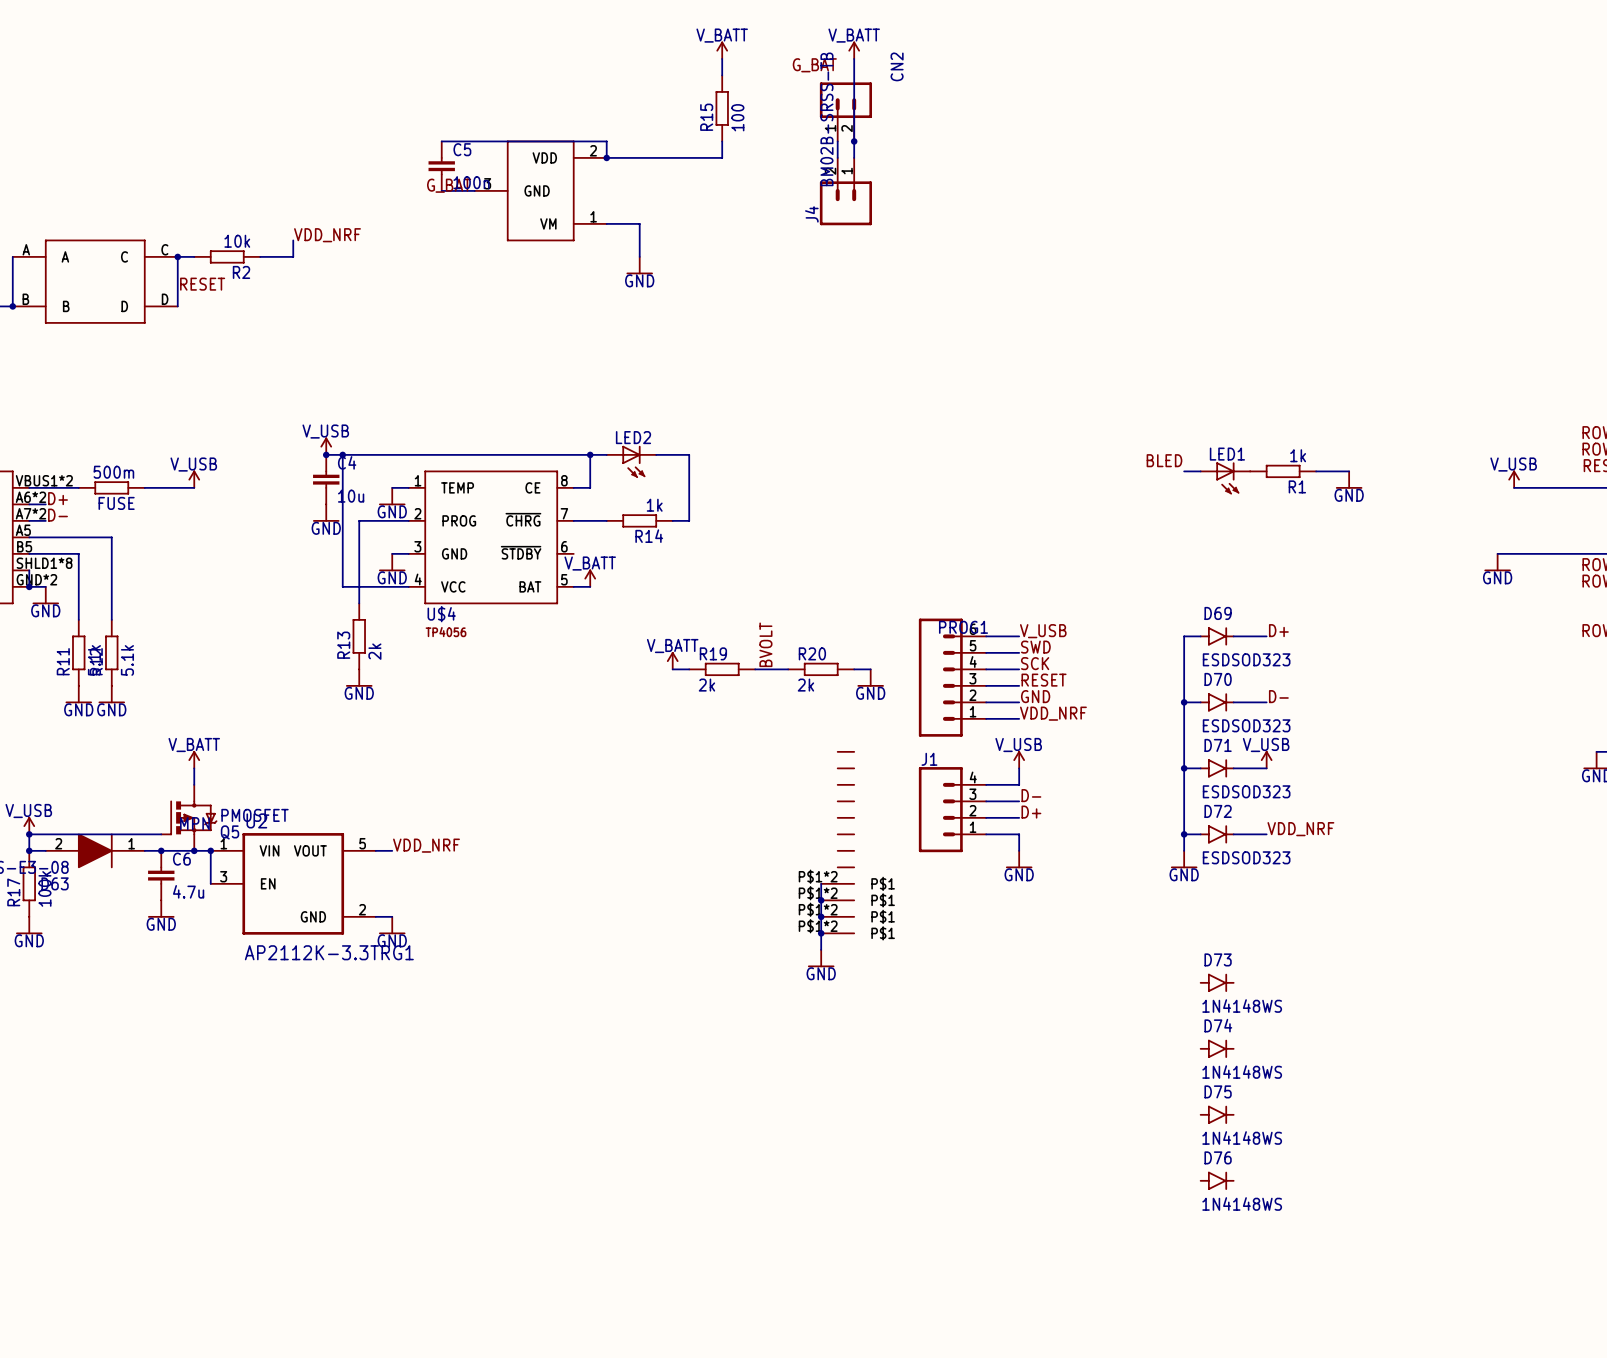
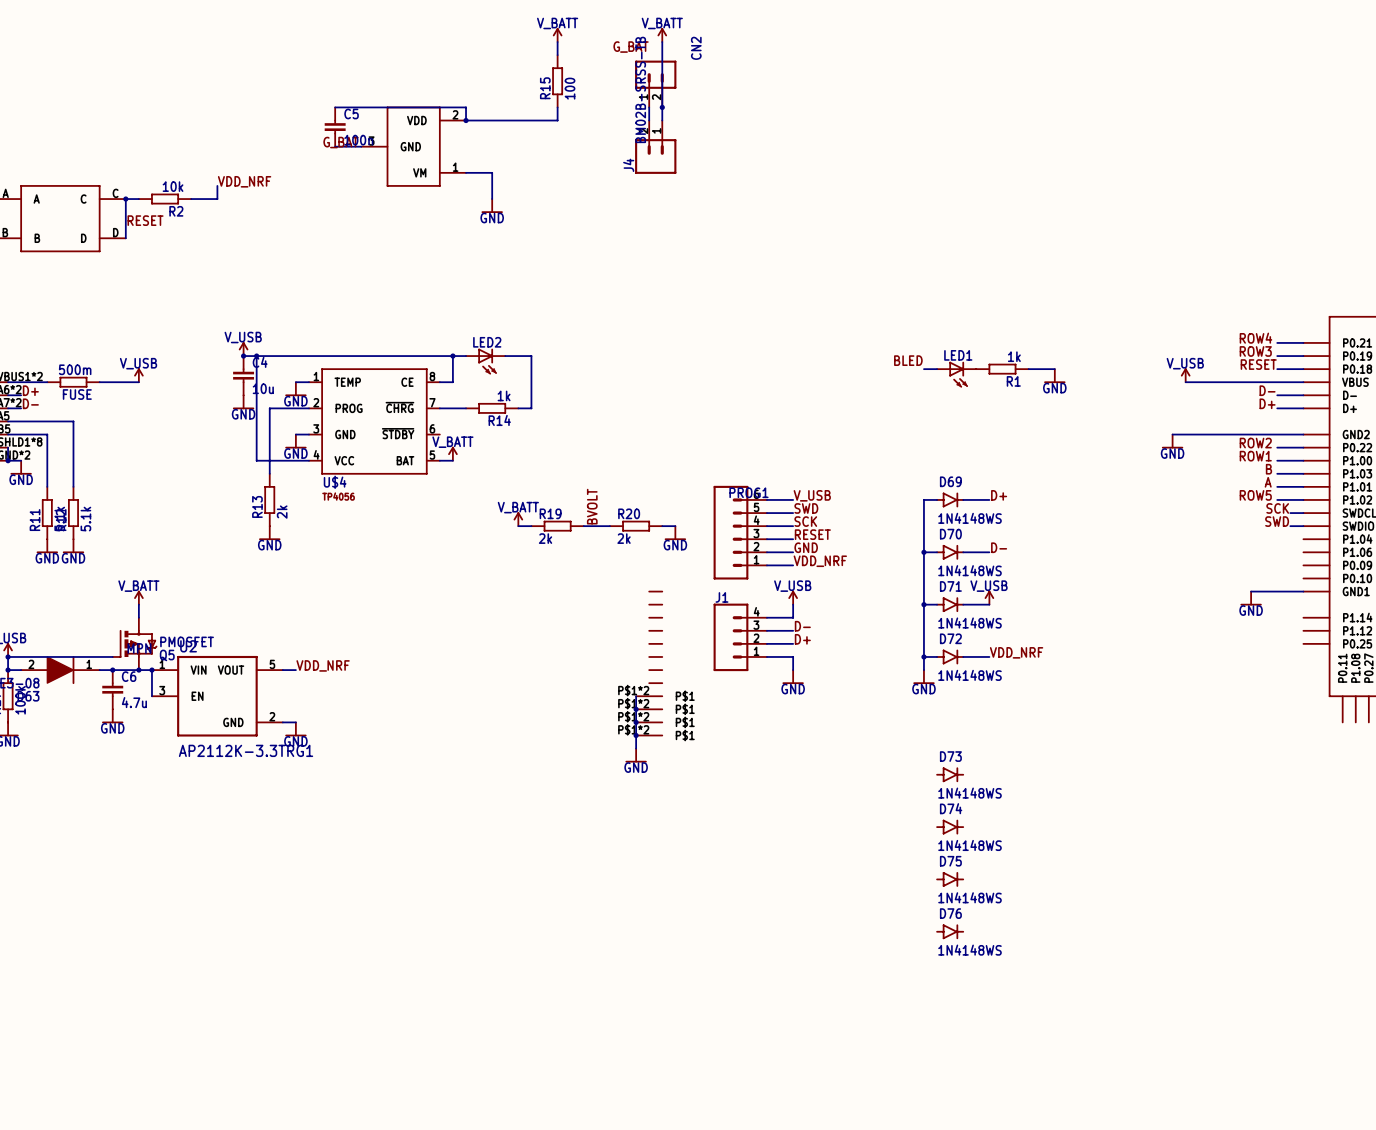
D69 value: ESDSOD323 (1246, 659) -> 1N4148WS (969, 518)
D70 value: ESDSOD323 (1246, 725) -> 1N4148WS (969, 570)
D71 value: ESDSOD323 (1246, 791) -> 1N4148WS (969, 623)
D72 value: ESDSOD323 (1246, 857) -> 1N4148WS (969, 675)

